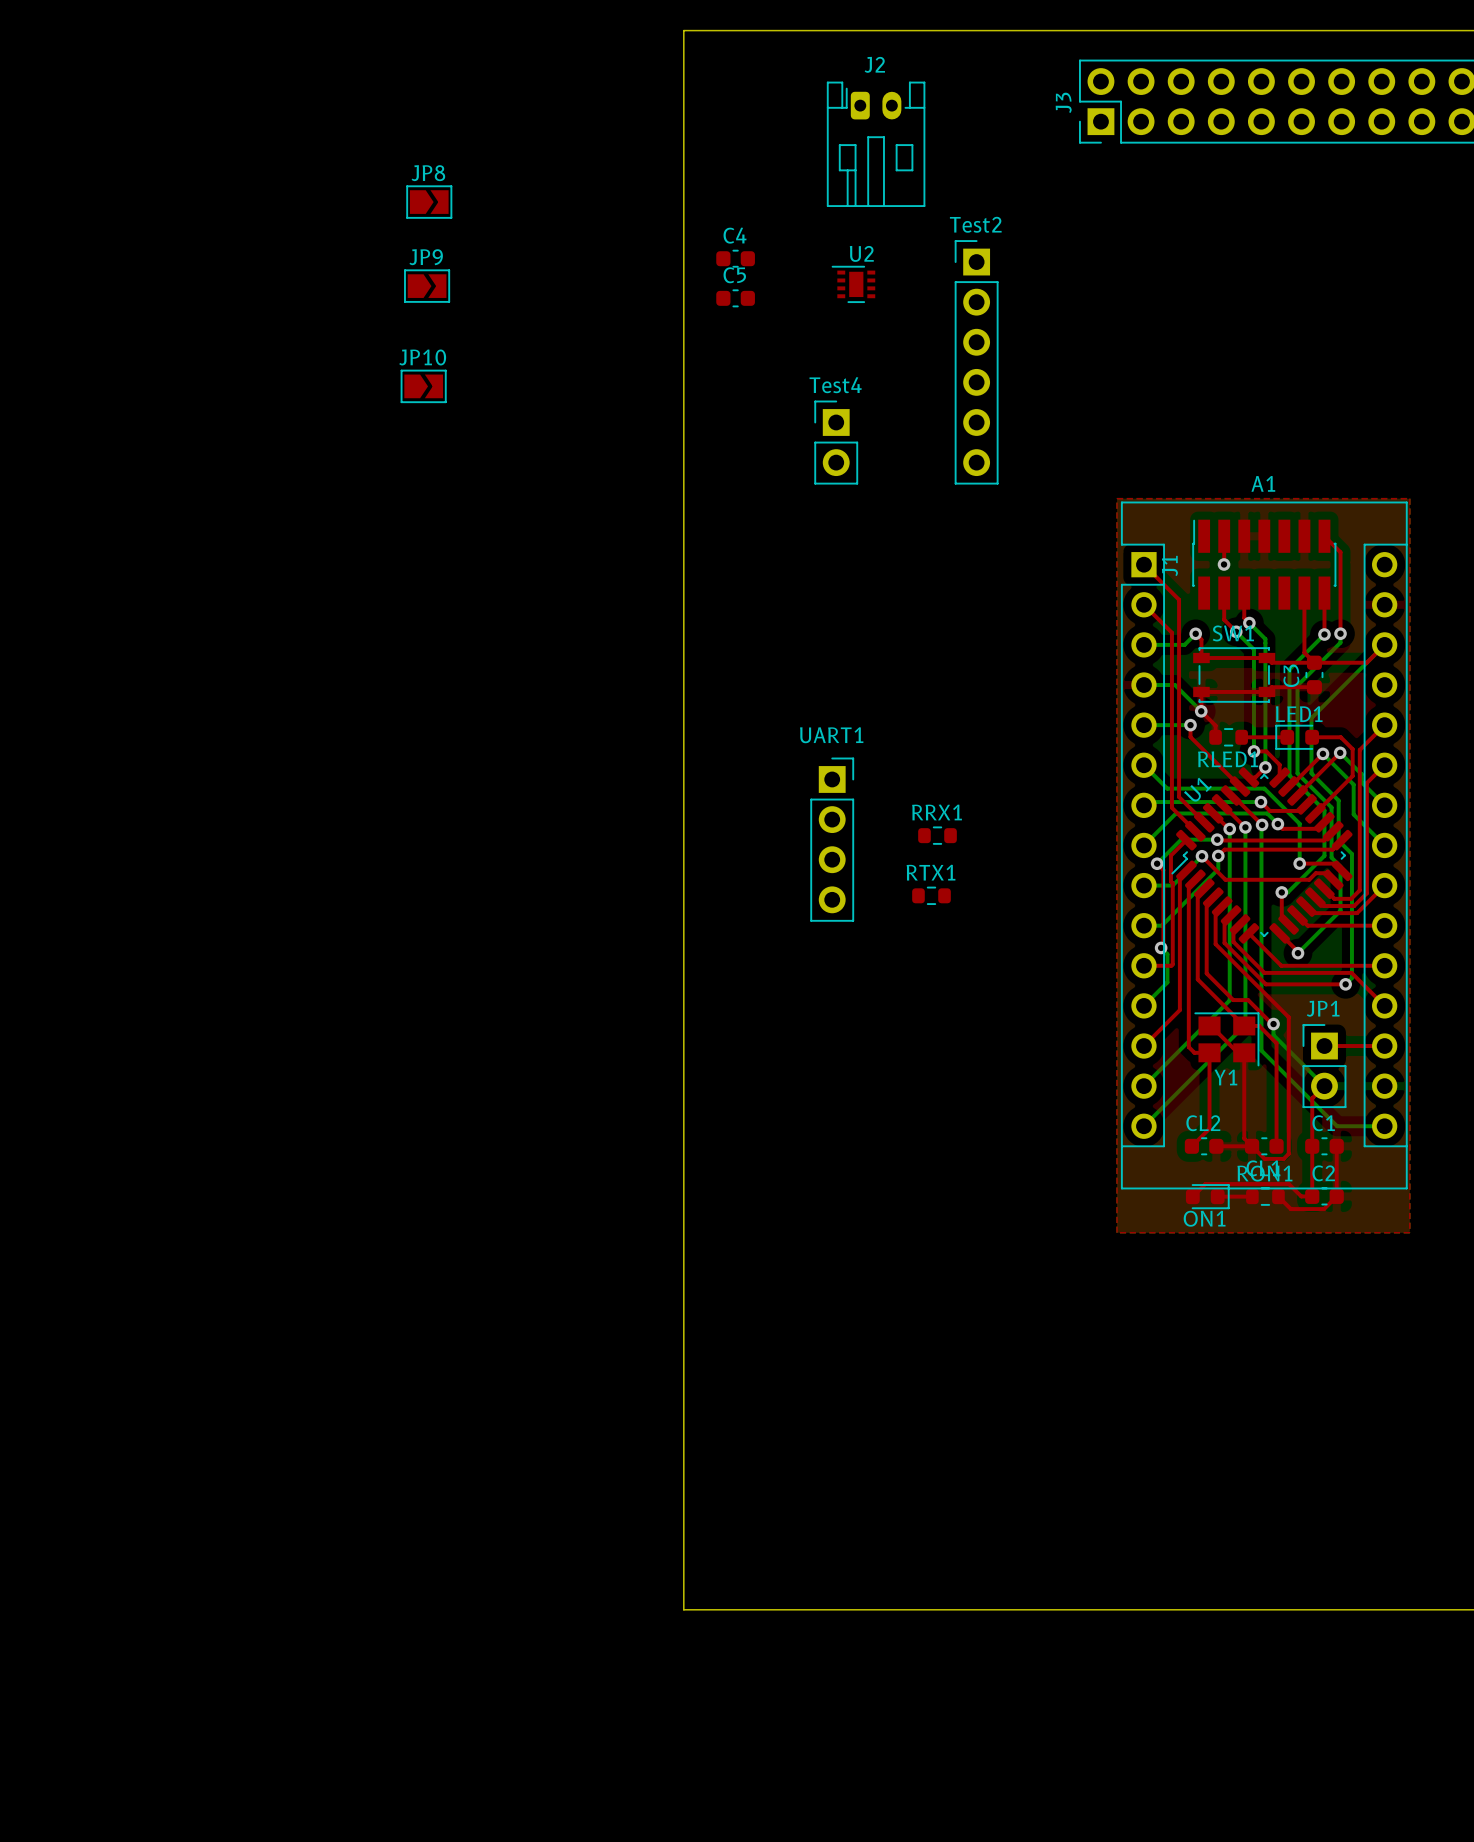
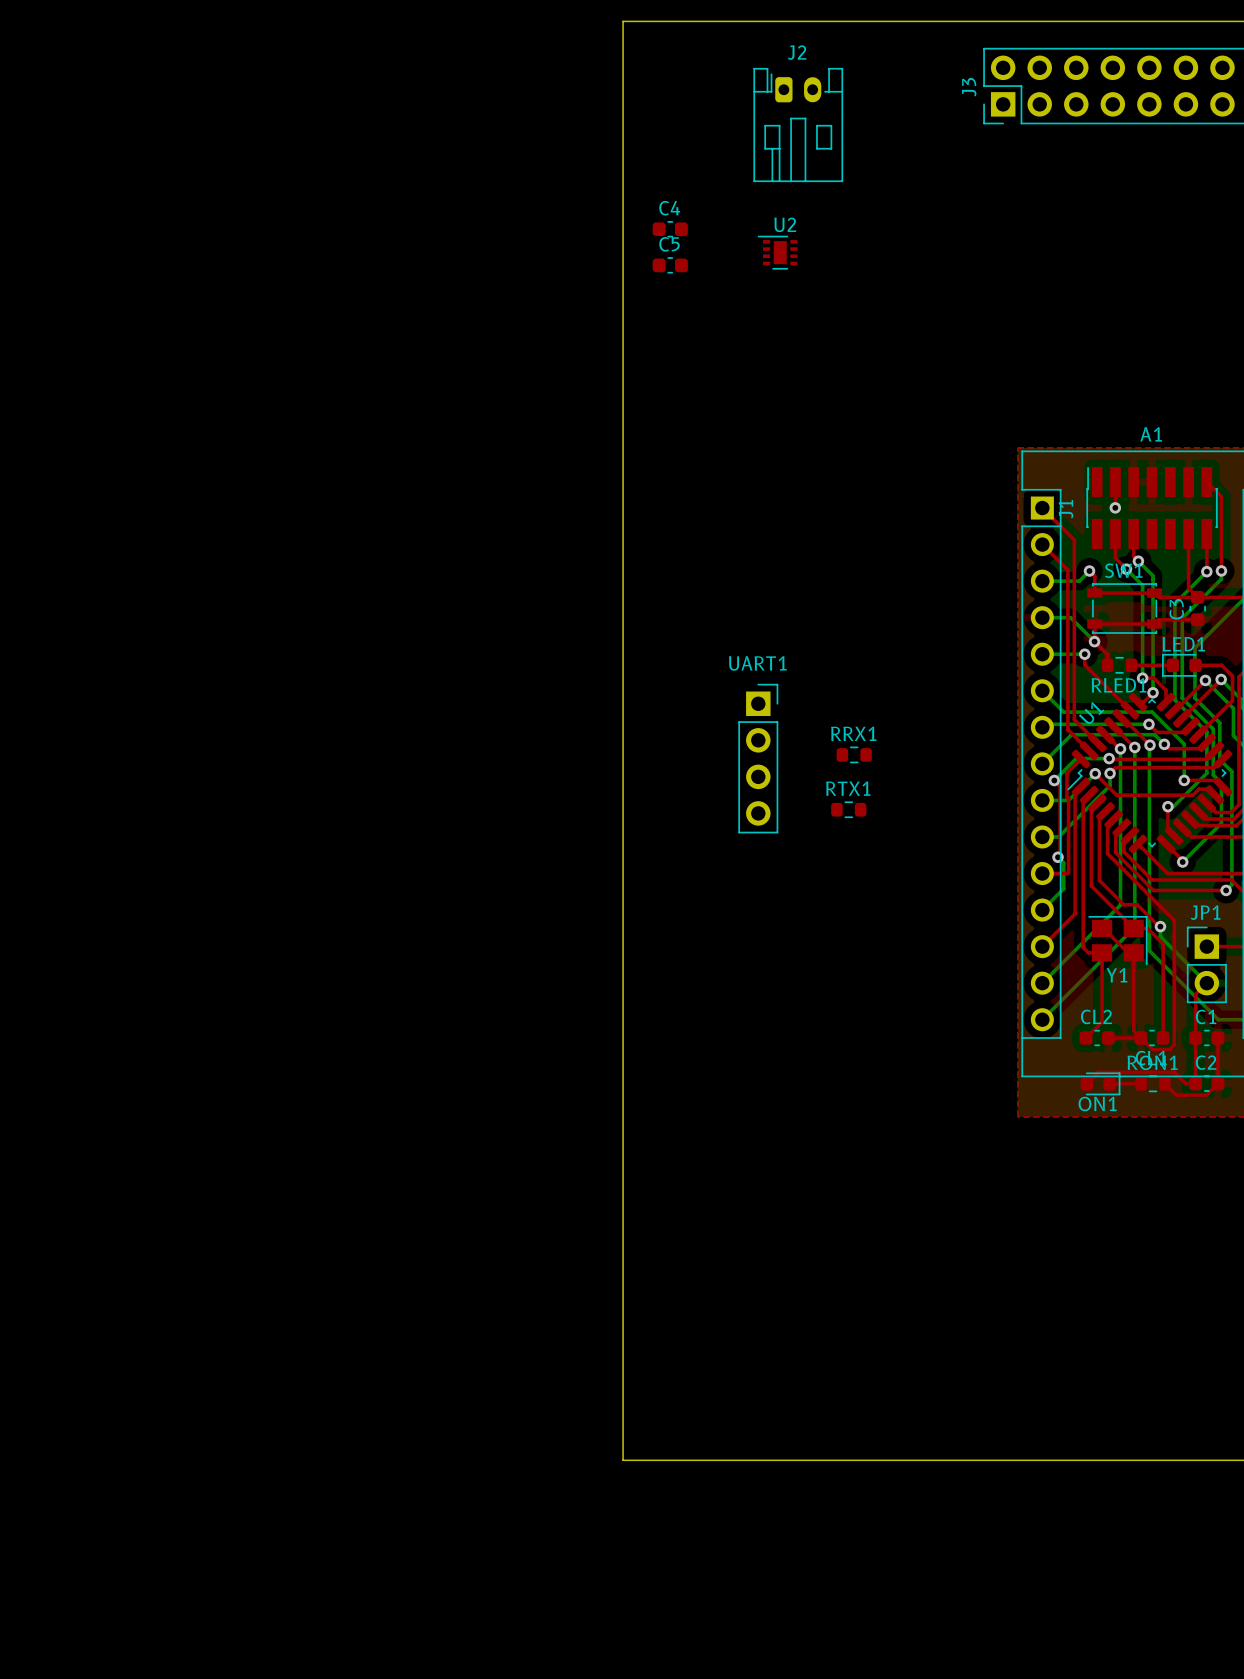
JP8: (429, 202) -> none
JP9: (427, 286) -> none
Test2: (976, 362) -> none
JP10: (423, 386) -> none
Test4: (836, 442) -> none

